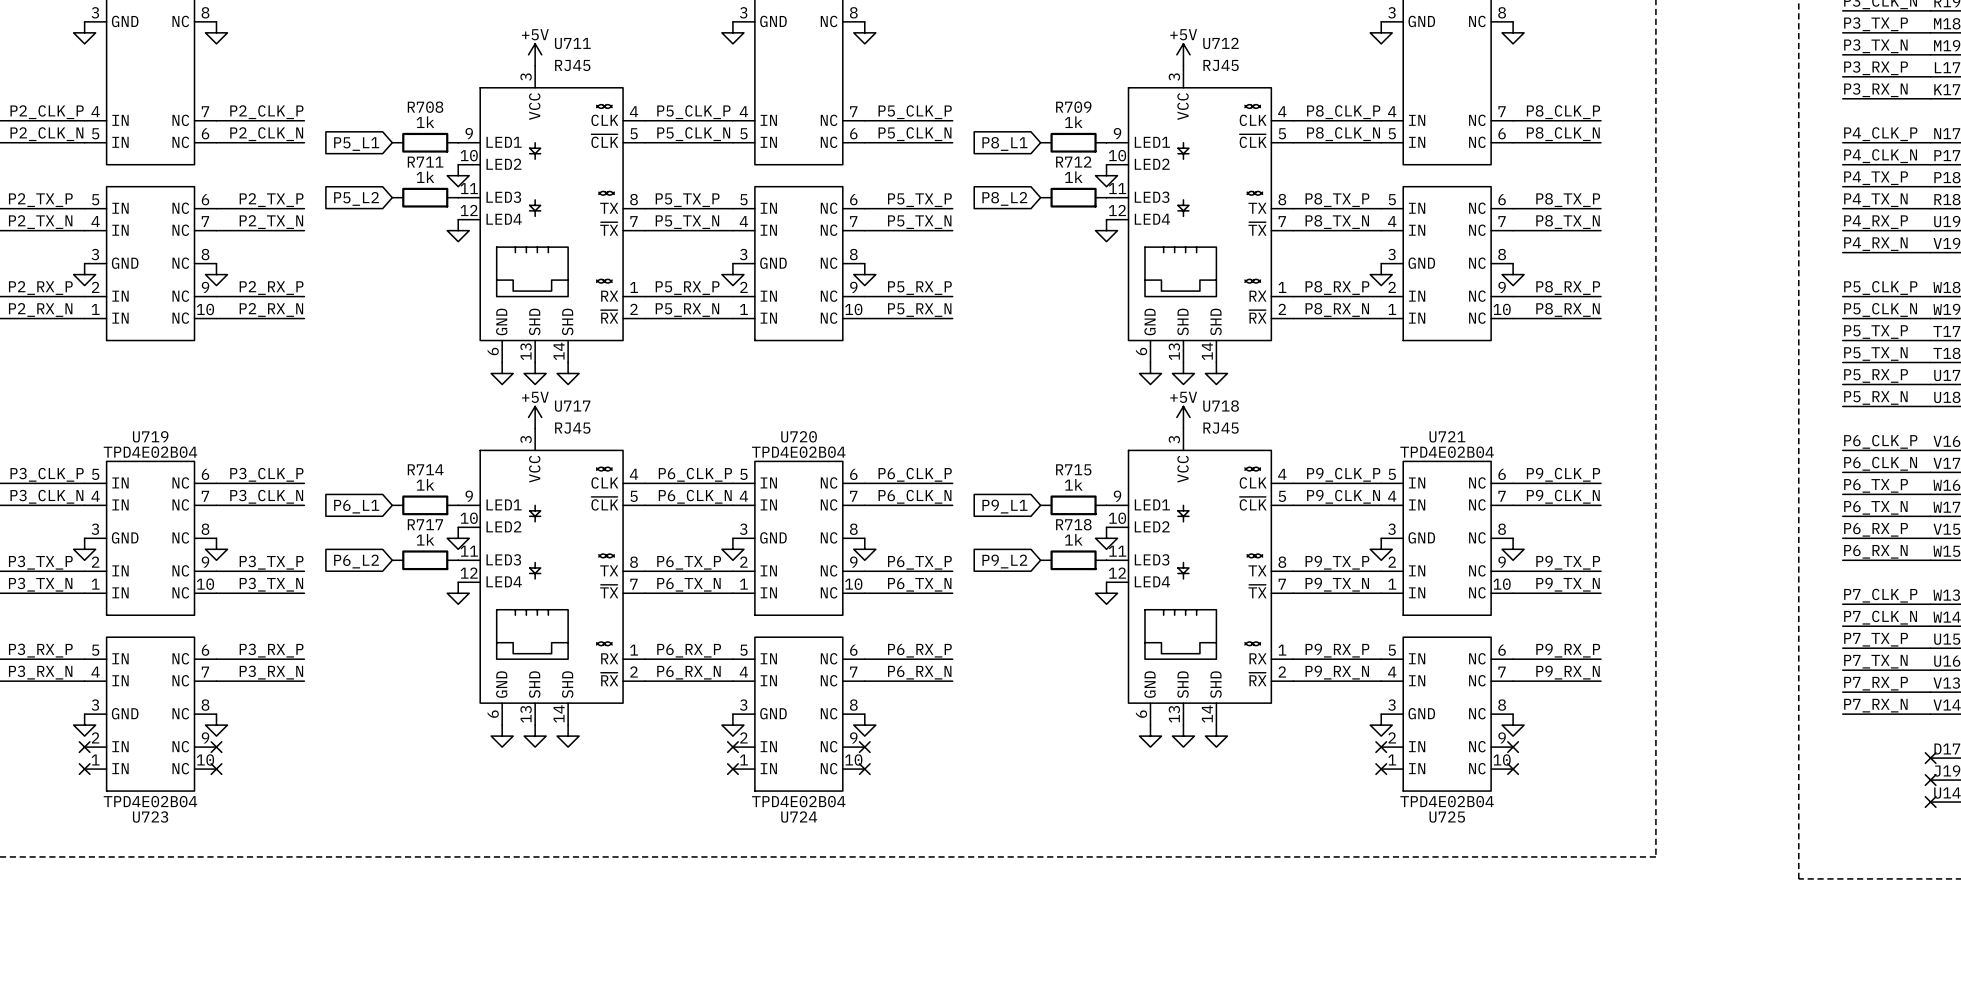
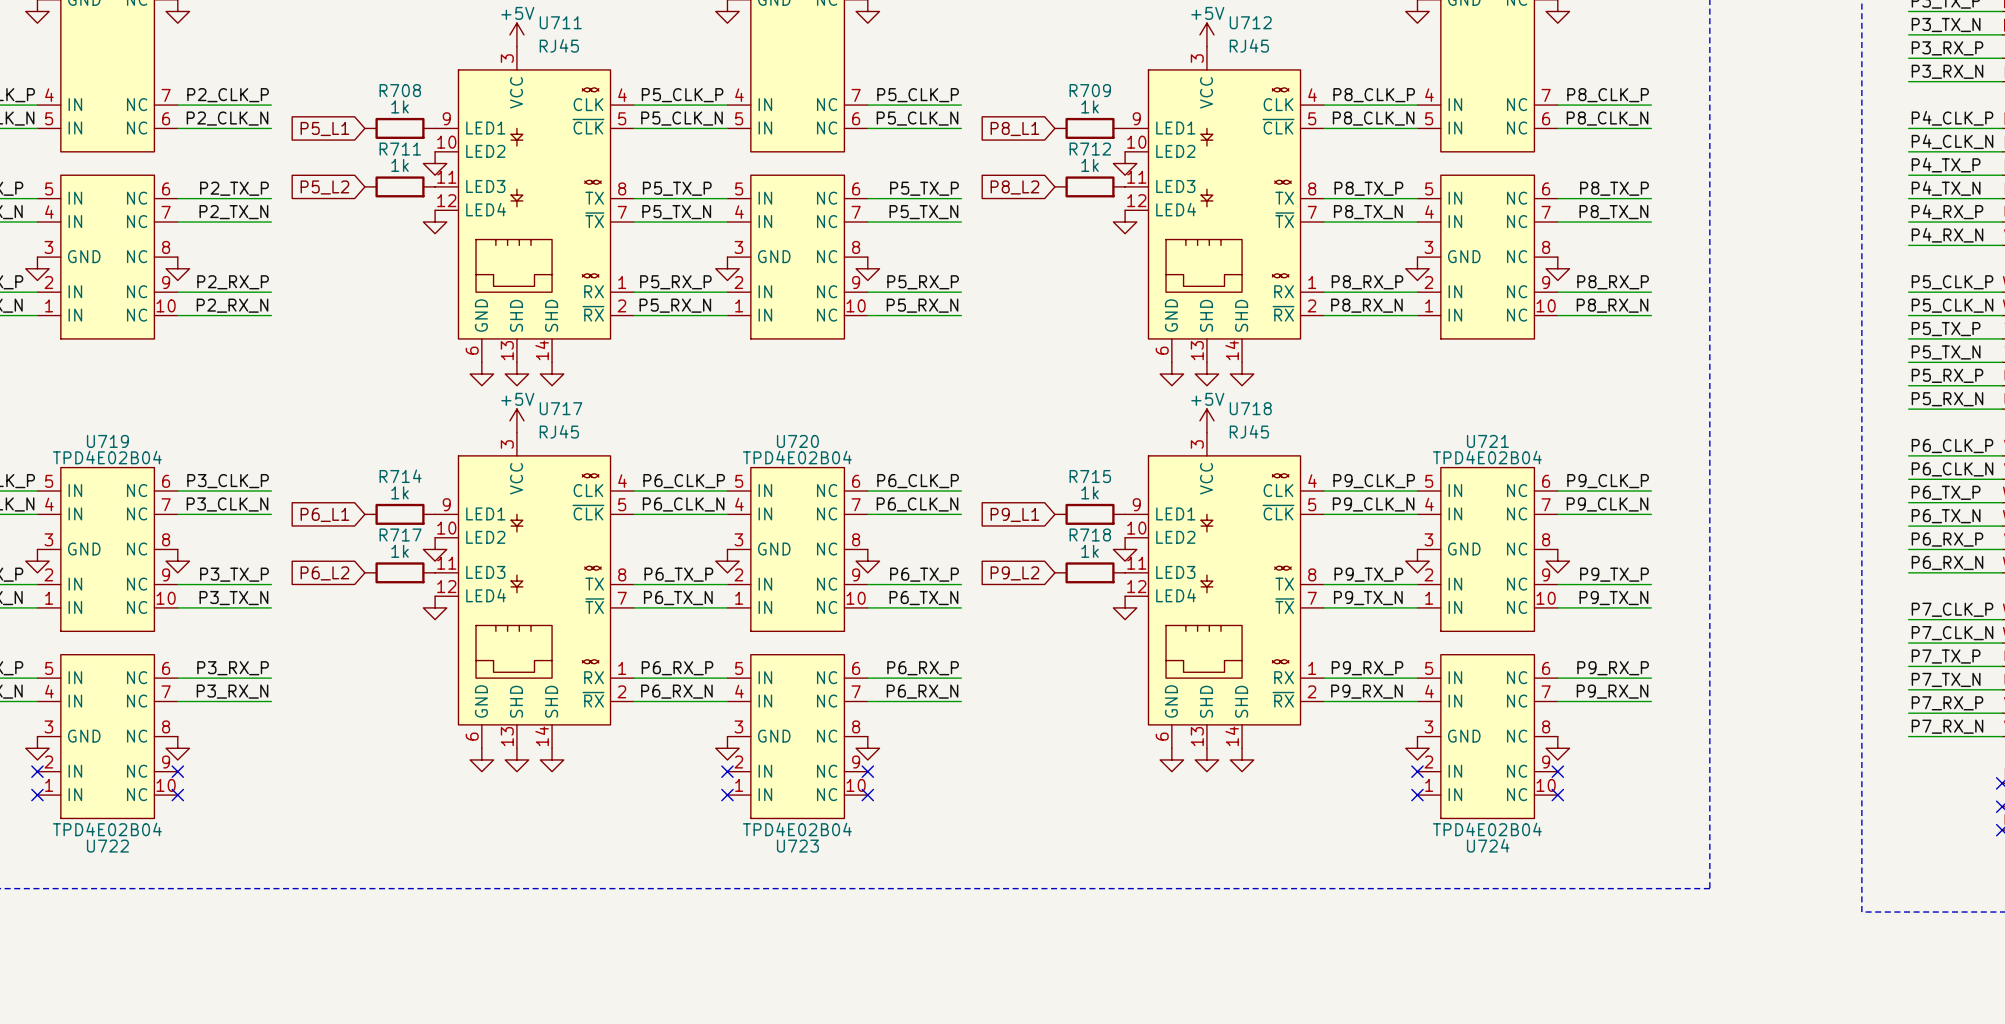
U723 name: U723 (150, 817) -> U722 (107, 846)
U724 name: U724 (799, 817) -> U723 (797, 846)
U725 name: U725 (1447, 817) -> U724 (1488, 845)

